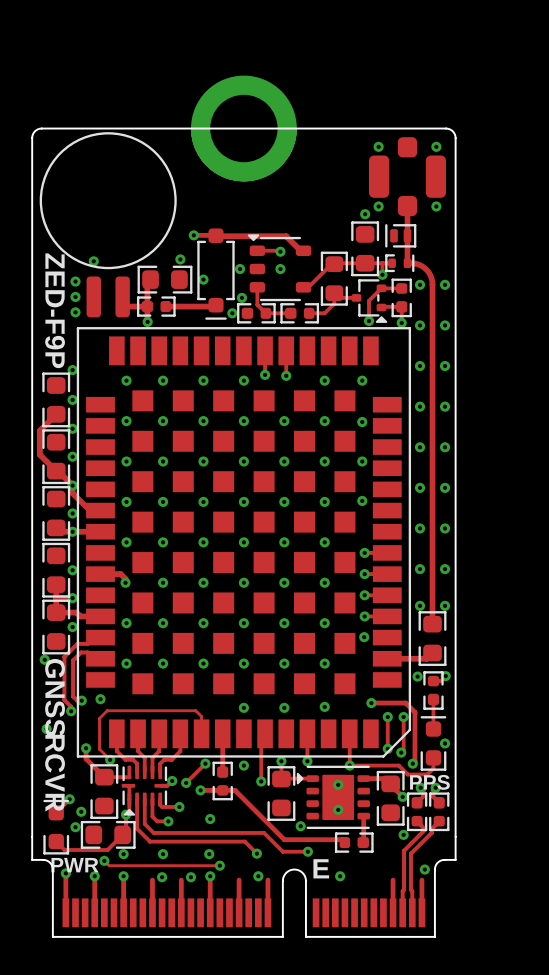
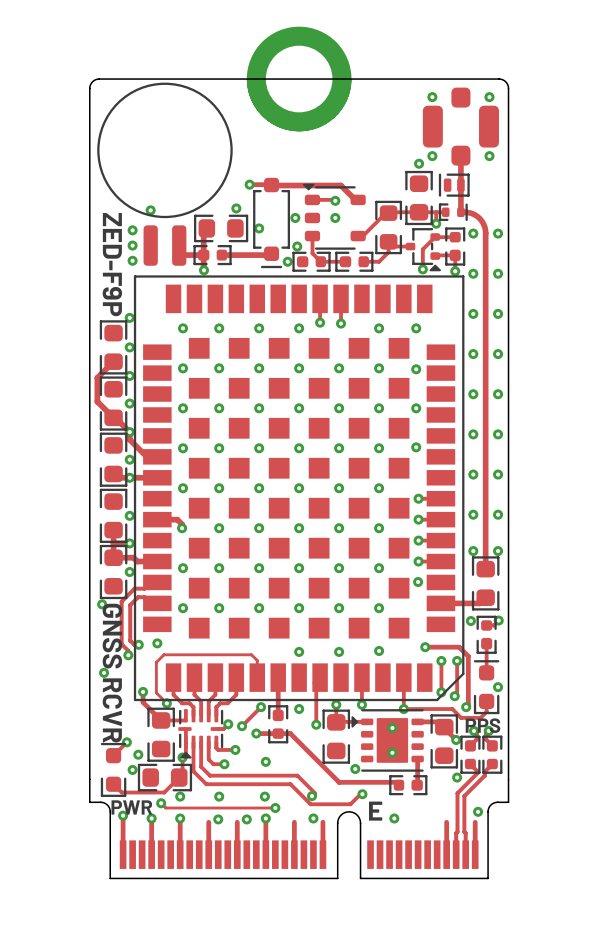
track: (242, 832) (264, 832) (282, 851) (307, 851) -> (297, 775) (315, 793)
track: (235, 841) (244, 841) (256, 853) -> (290, 784) (310, 804) (350, 804) (358, 796)

